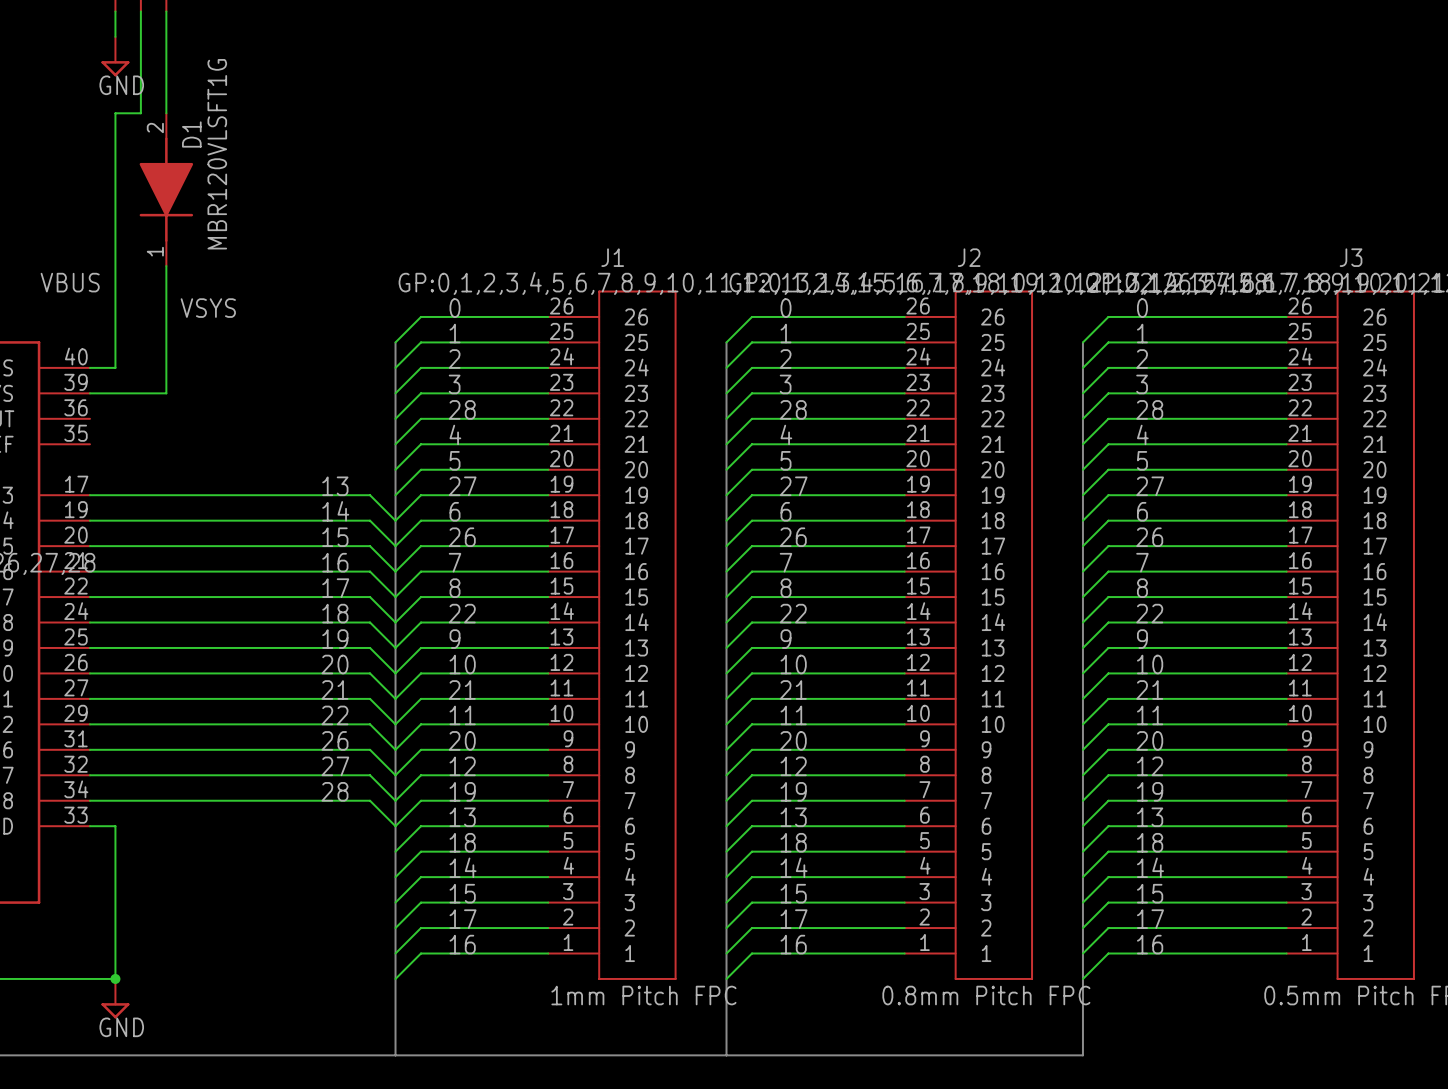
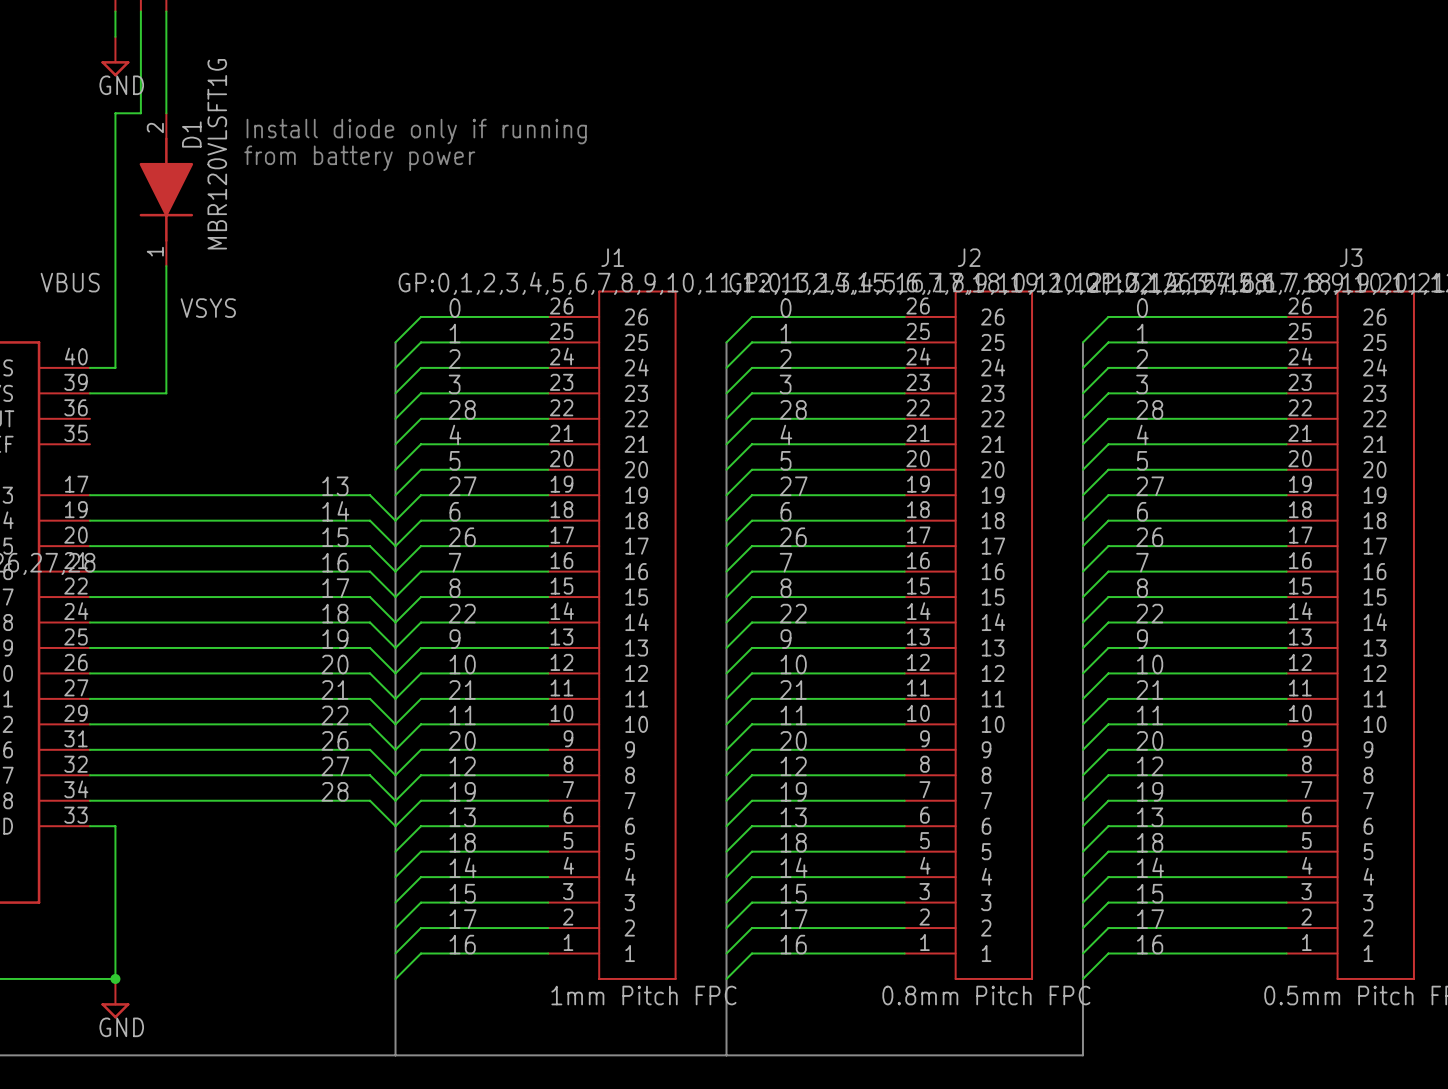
text: none -> Install diode only if running (416, 131)
text: none -> from battery power (359, 158)

